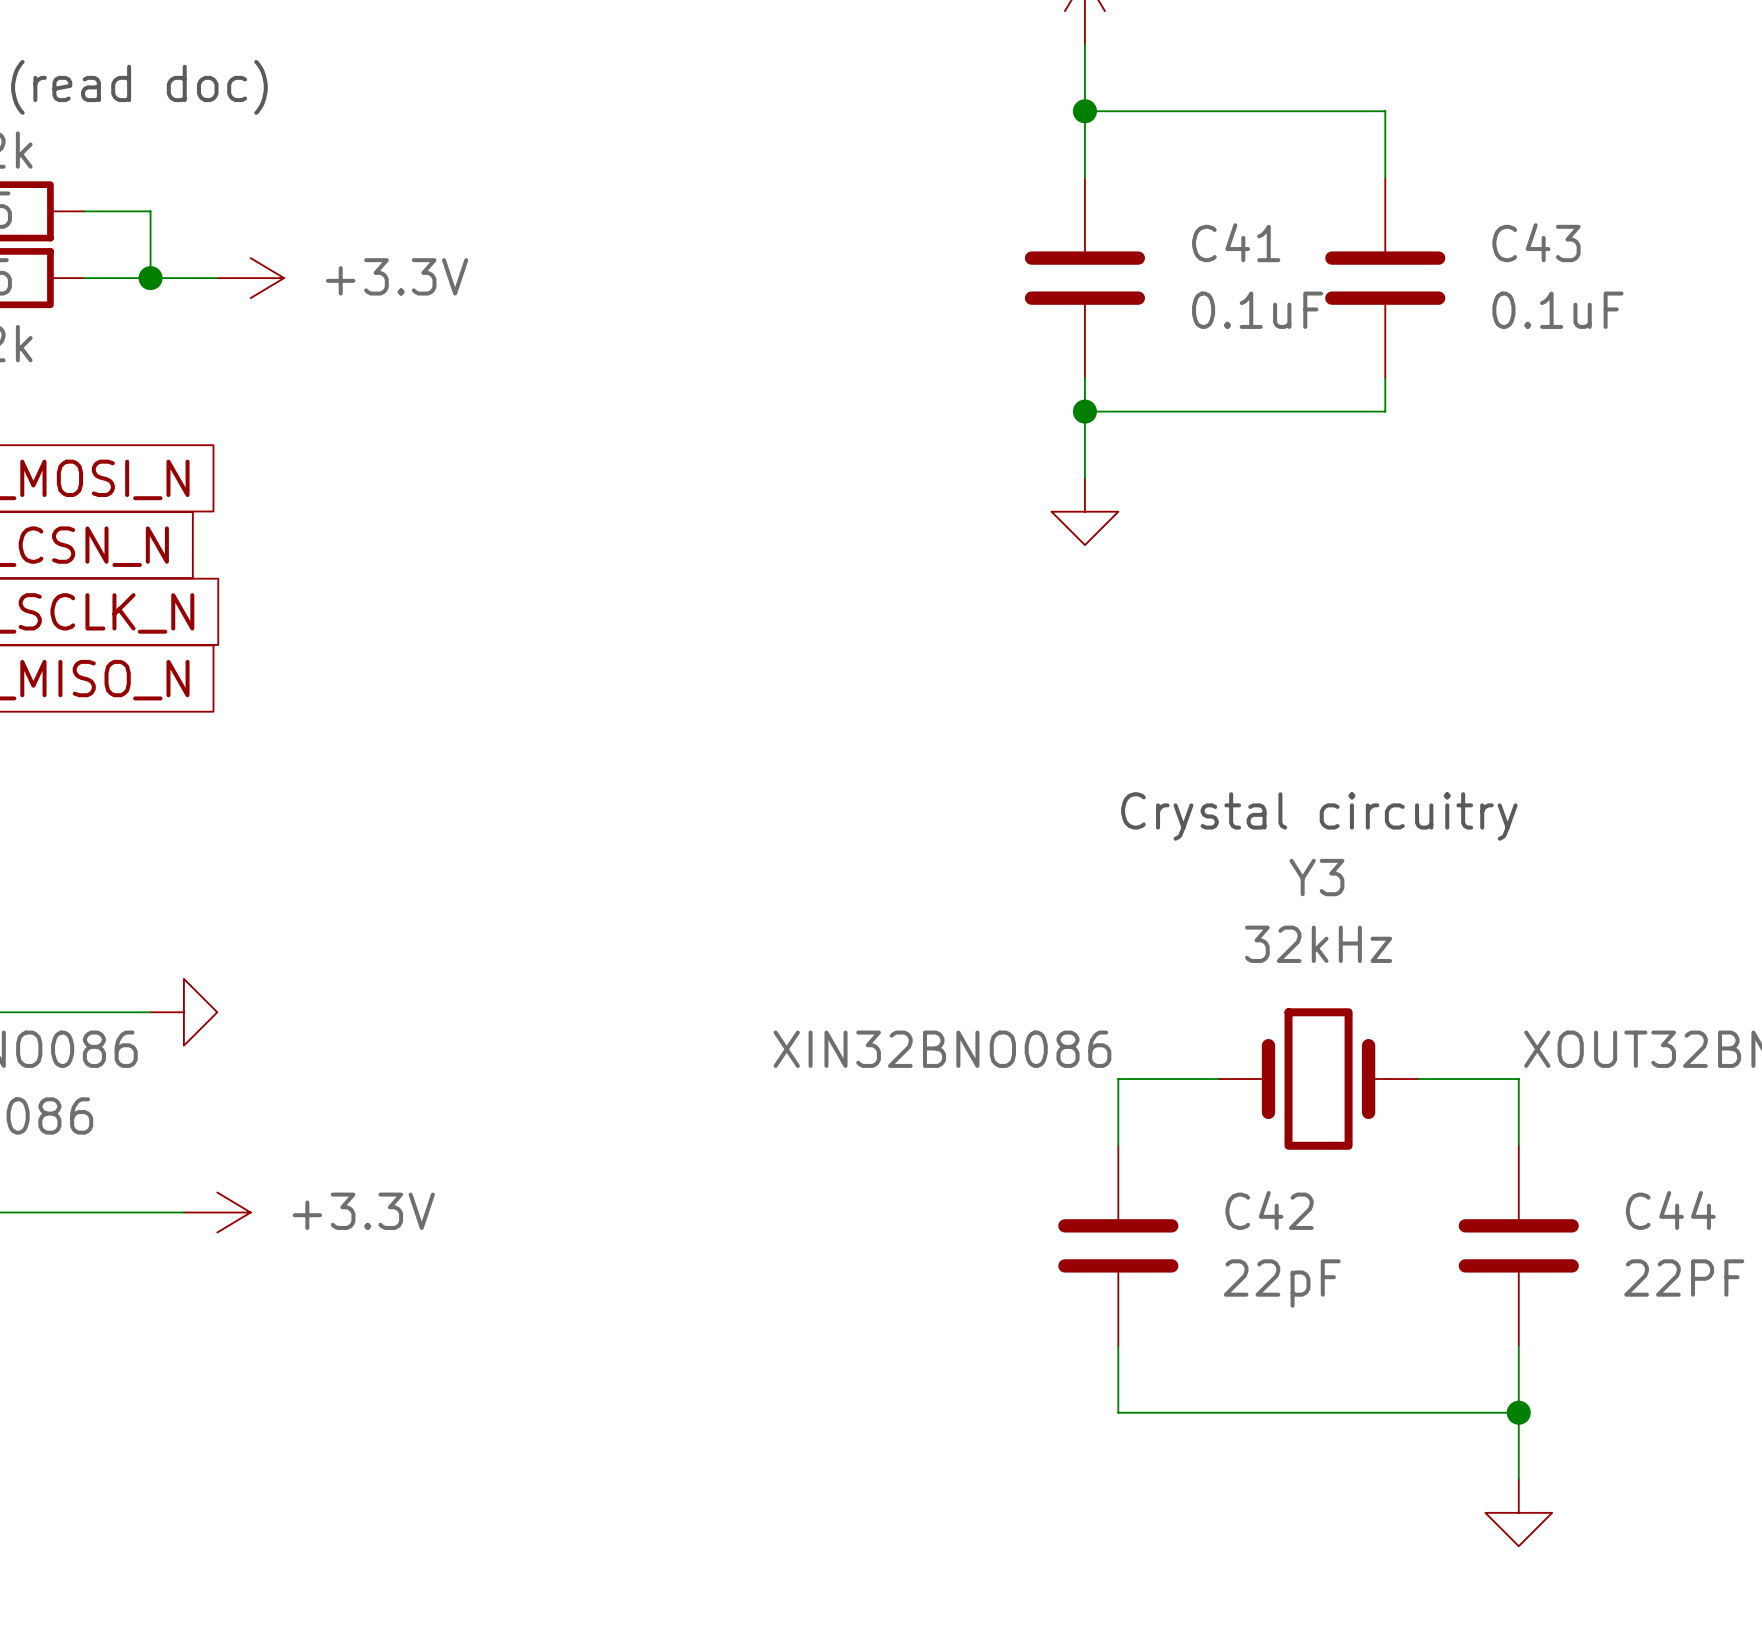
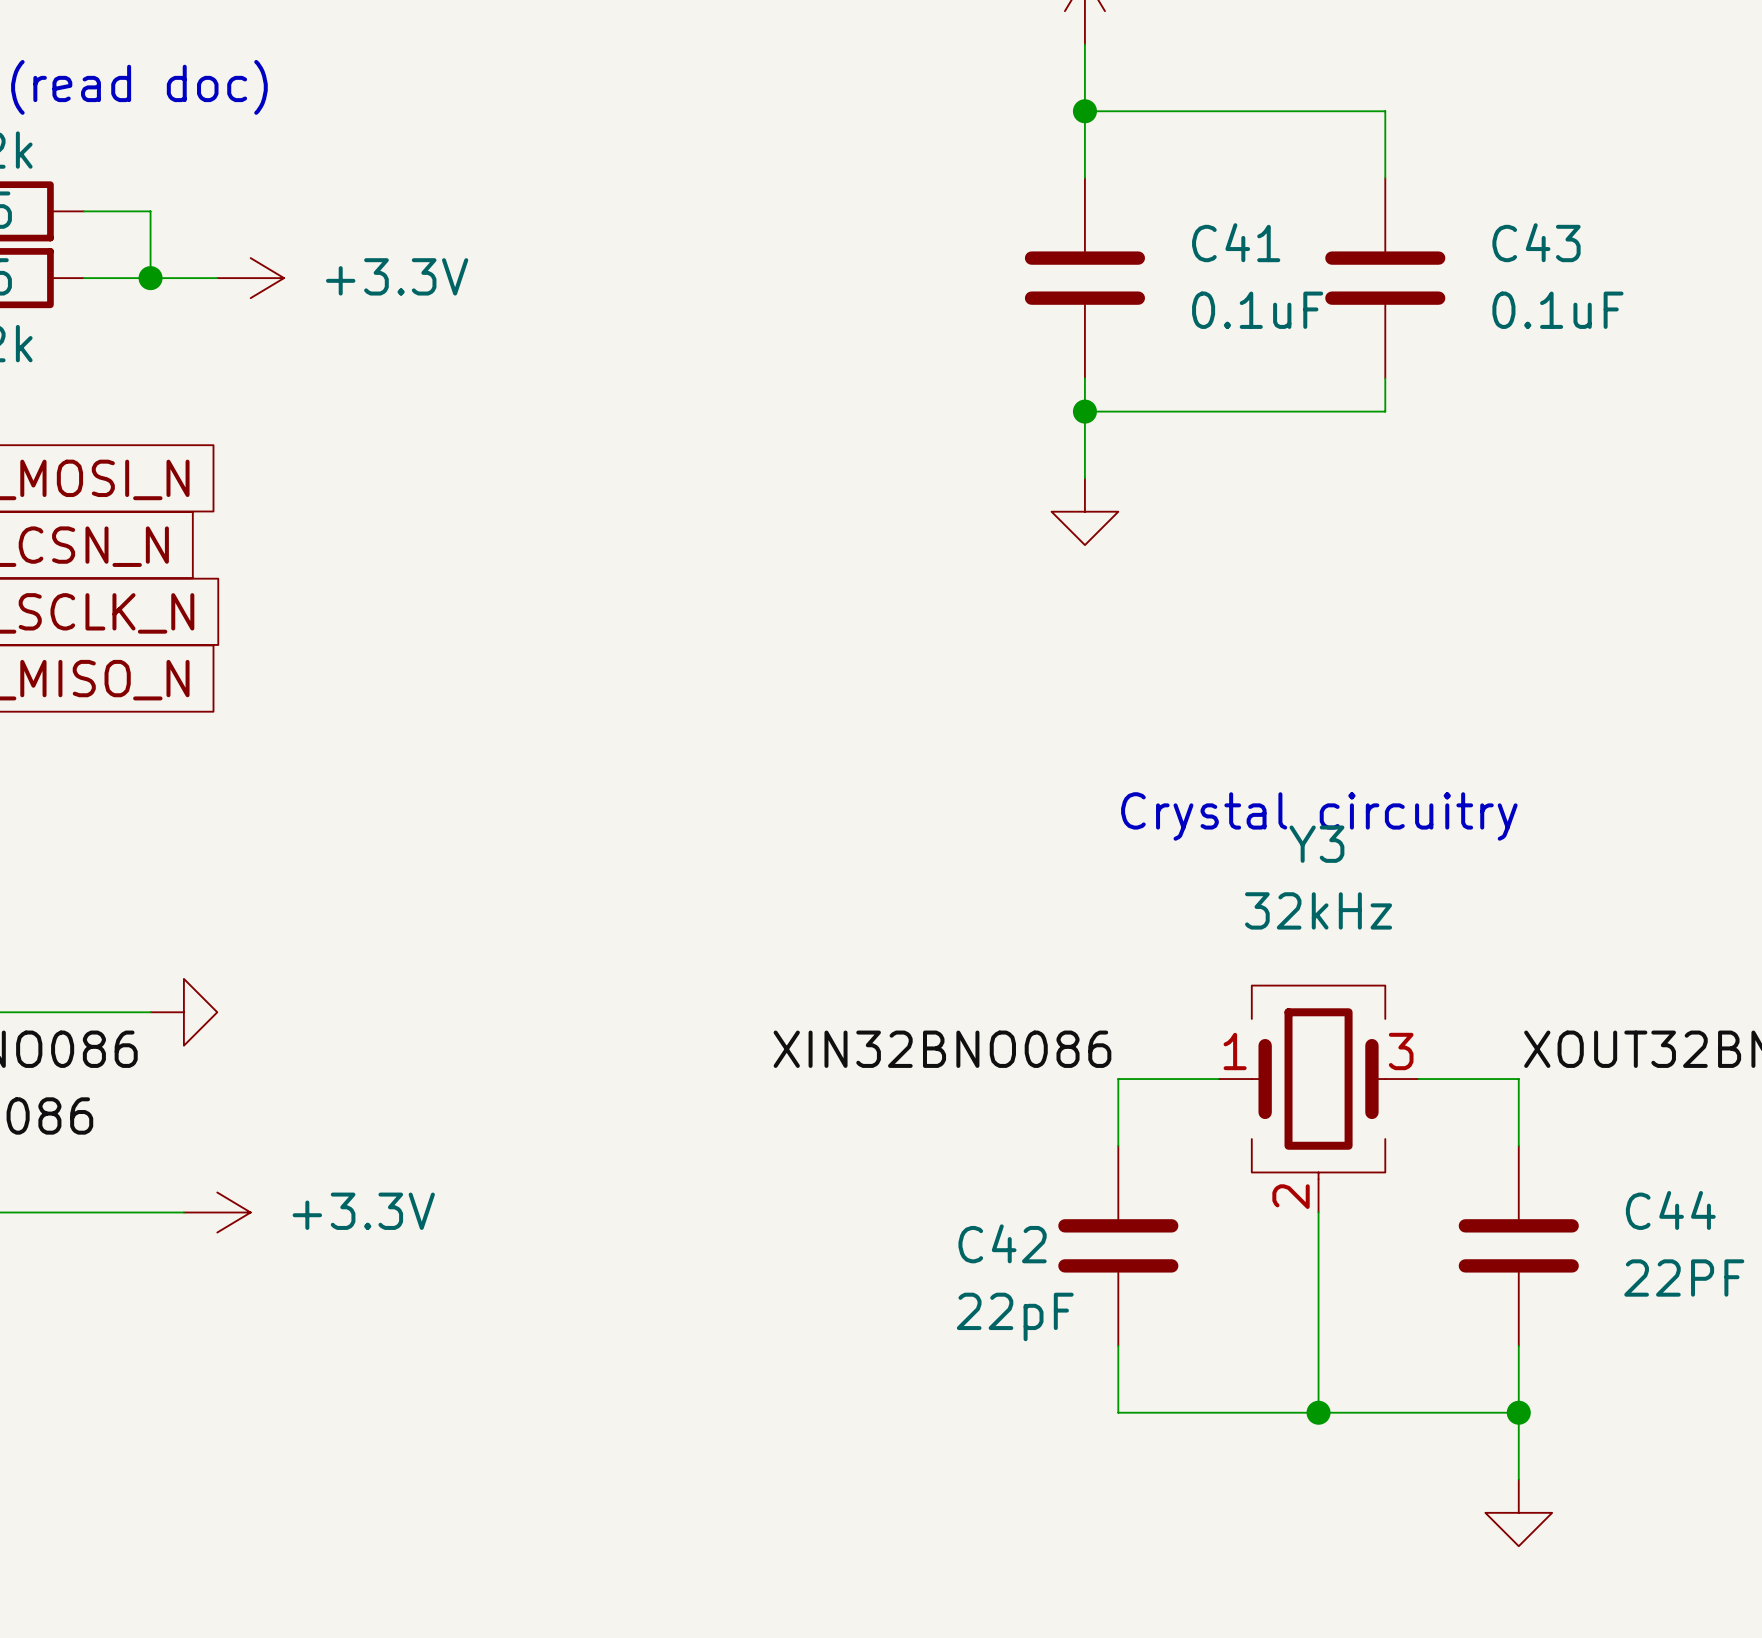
Y3 name position: Y3 (1316, 877) -> Y3 (1316, 844)
Y3 value position: 32kHz (1318, 944) -> 32kHz (1318, 910)
Y3 symbol: [1218, 1008, 1419, 1150] -> [1218, 985, 1419, 1213]
C42 name position: C42 (1269, 1210) -> C42 (1002, 1243)
wire: none -> (1318, 1212) (1318, 1412)
C42 value position: 22pF (1282, 1283) -> 22pF (1015, 1316)
junction: none -> (1318, 1412)

